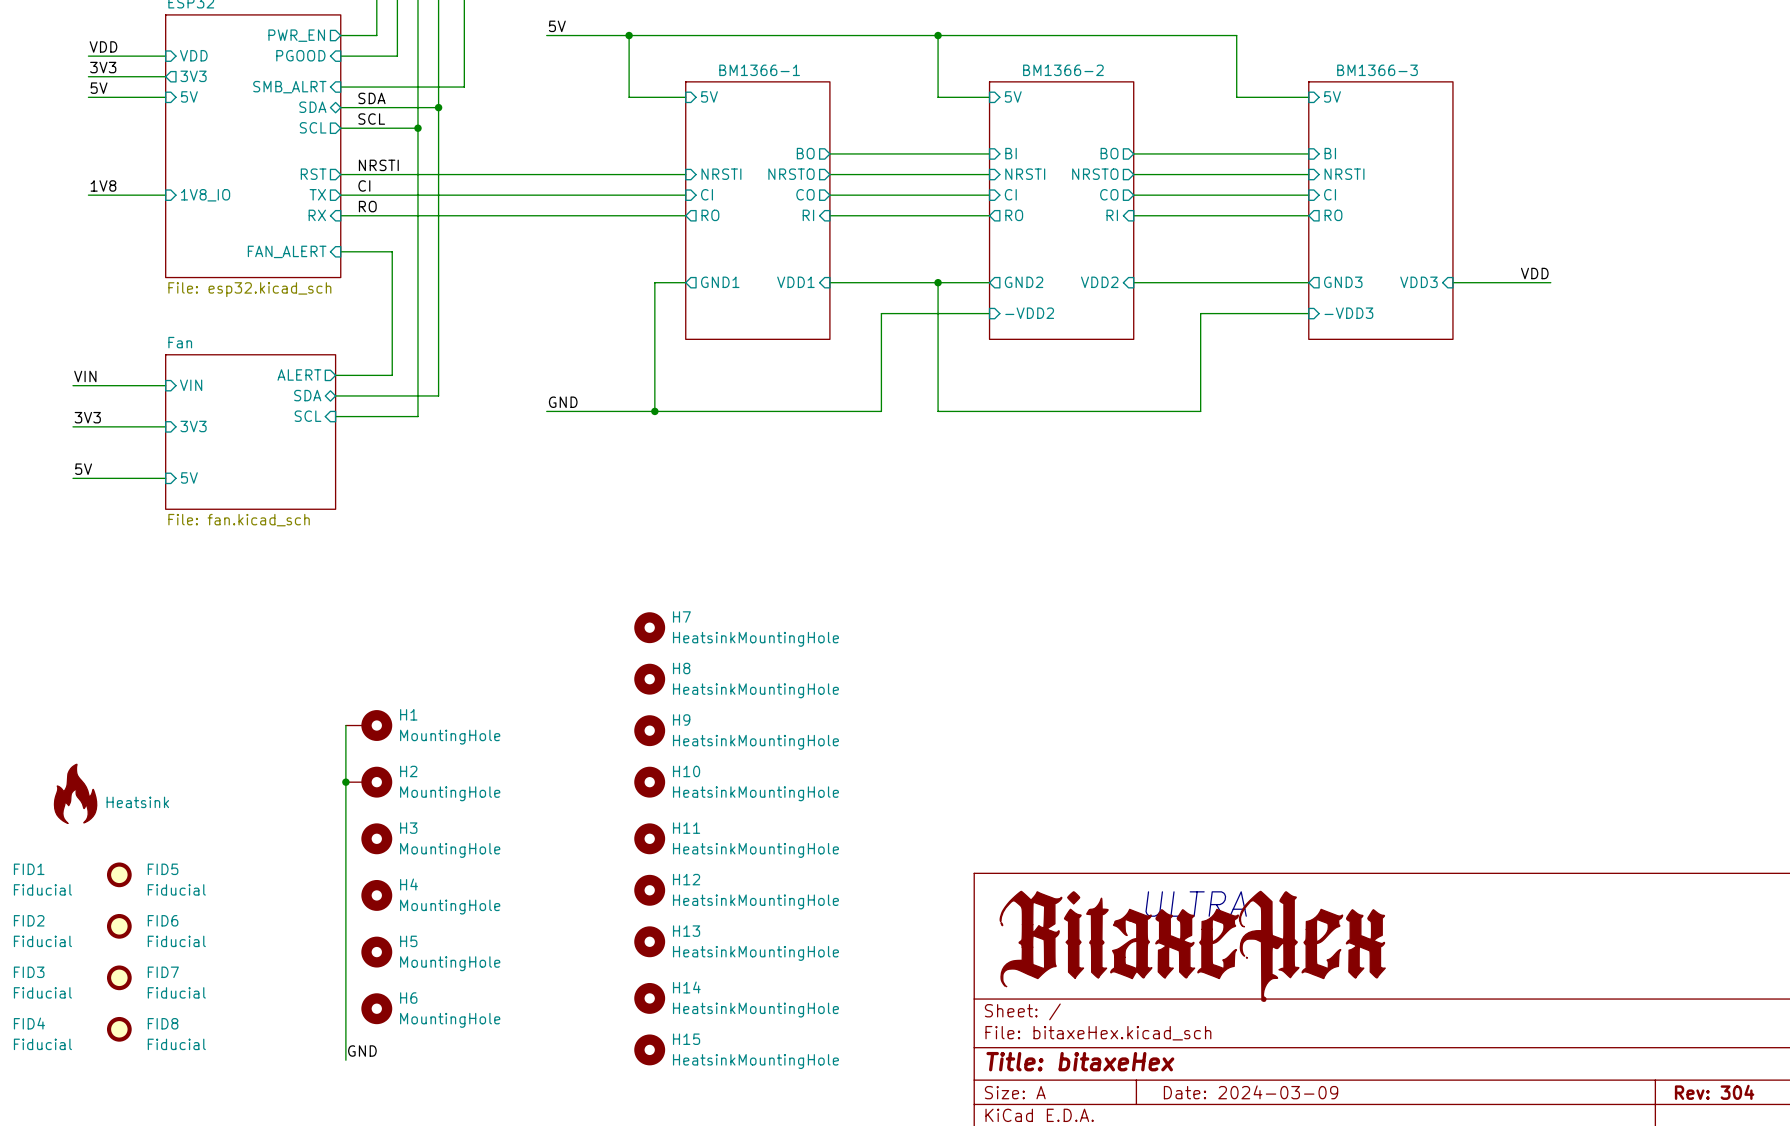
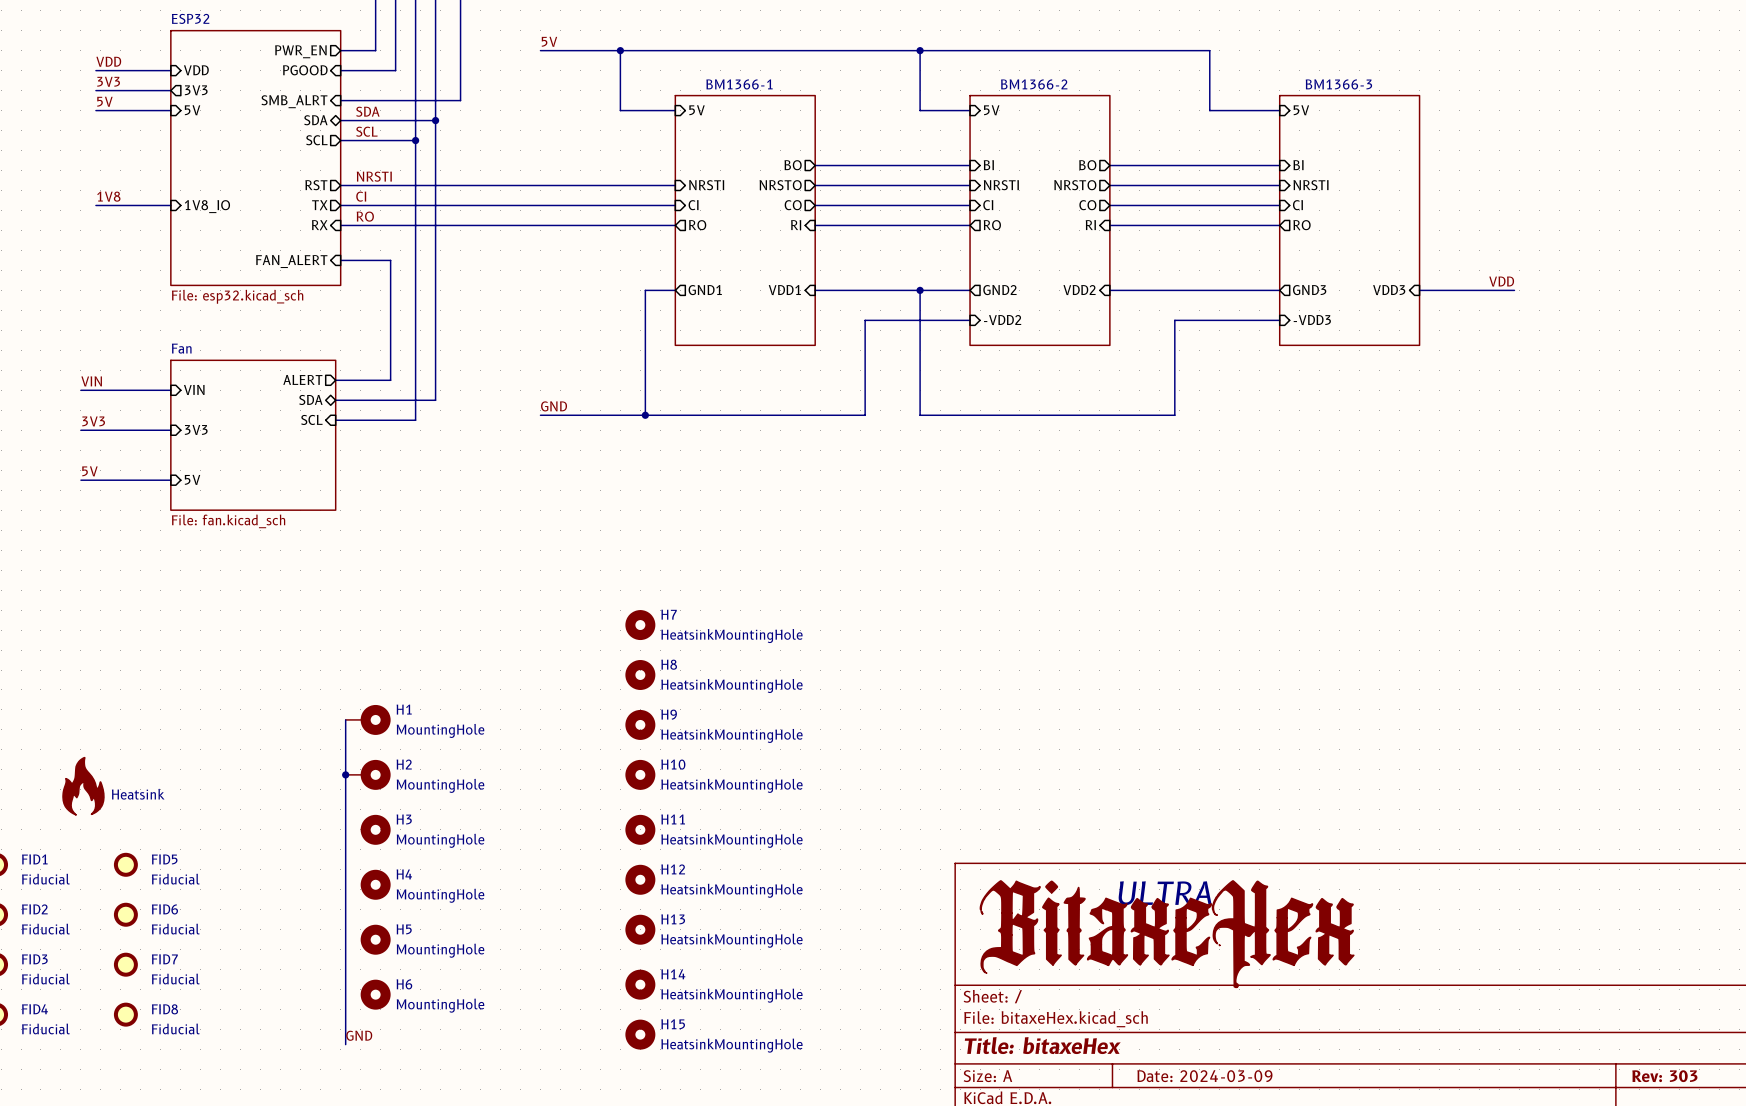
title block: Rev: 304 (1714, 1092) -> Rev: 303 (1664, 1076)

